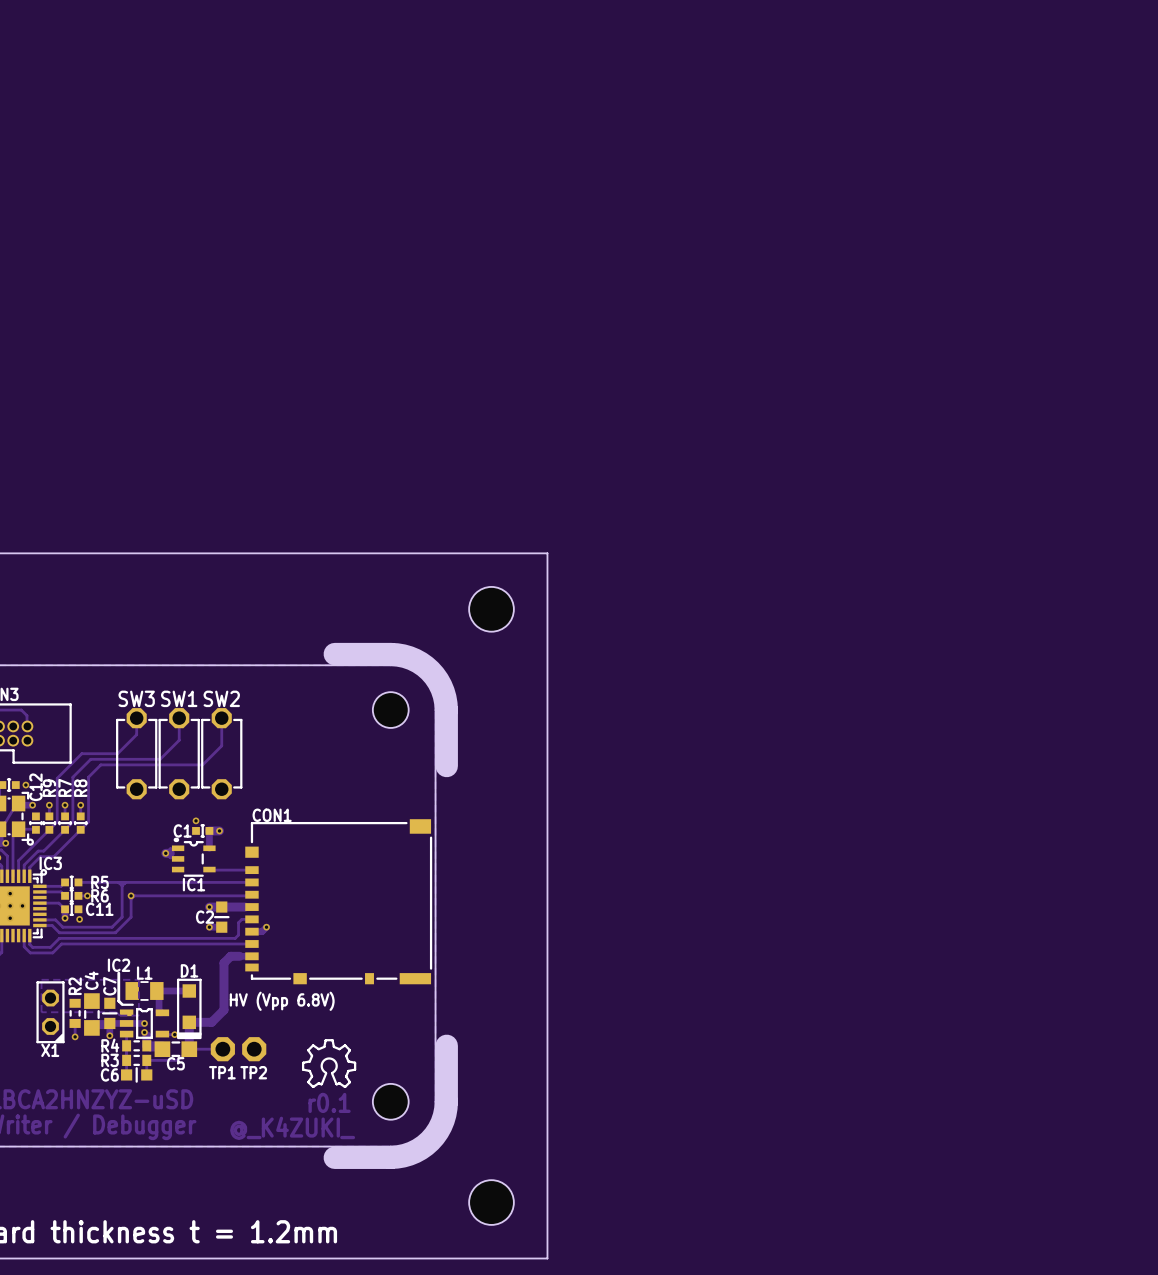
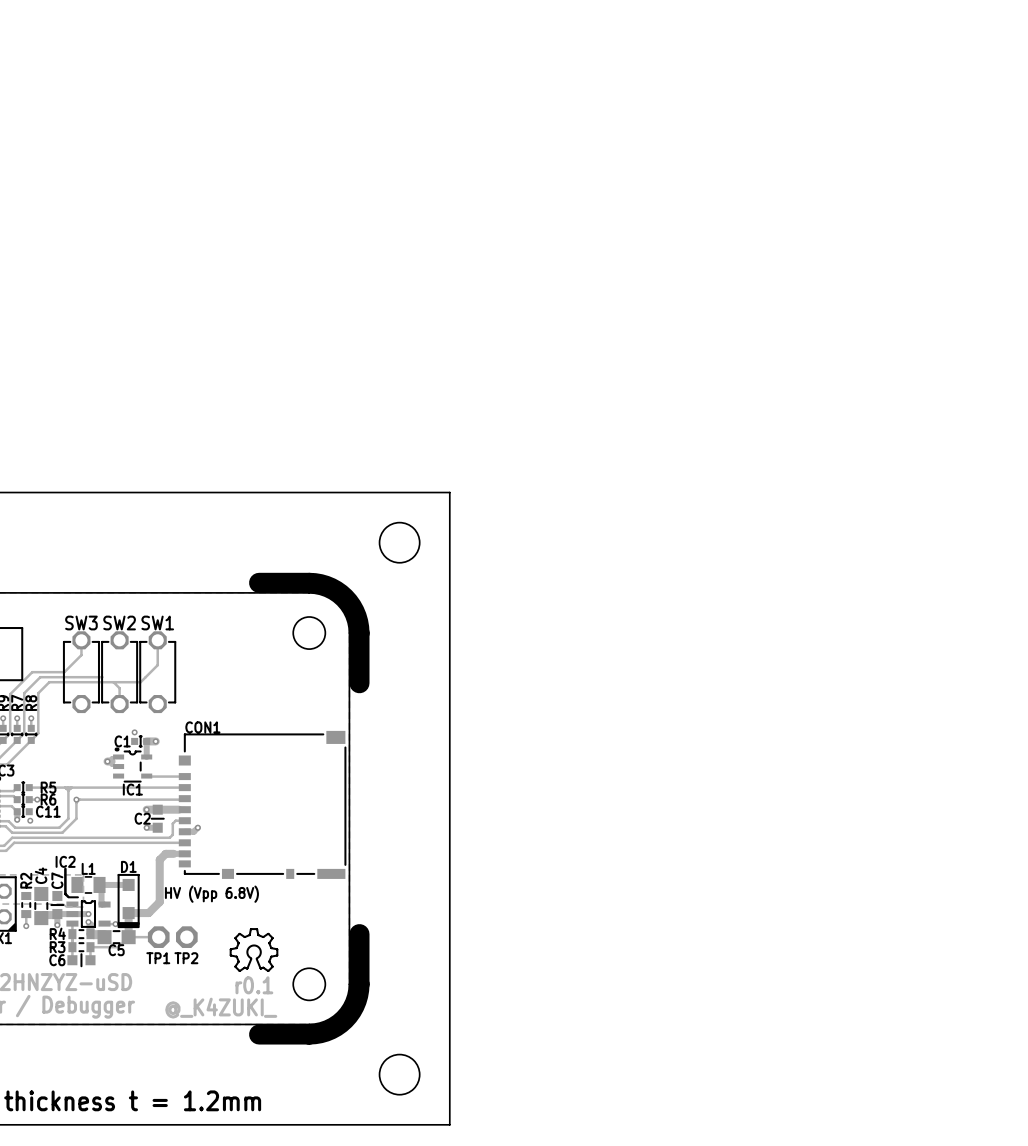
SW1 name: SW1 (179, 698) -> SW2 (119, 623)
SW2 name: SW2 (221, 698) -> SW1 (157, 623)
track: (179, 718) (179, 740) (160, 759) -> none
track: none -> (113, 682) (119, 688) (119, 704)

